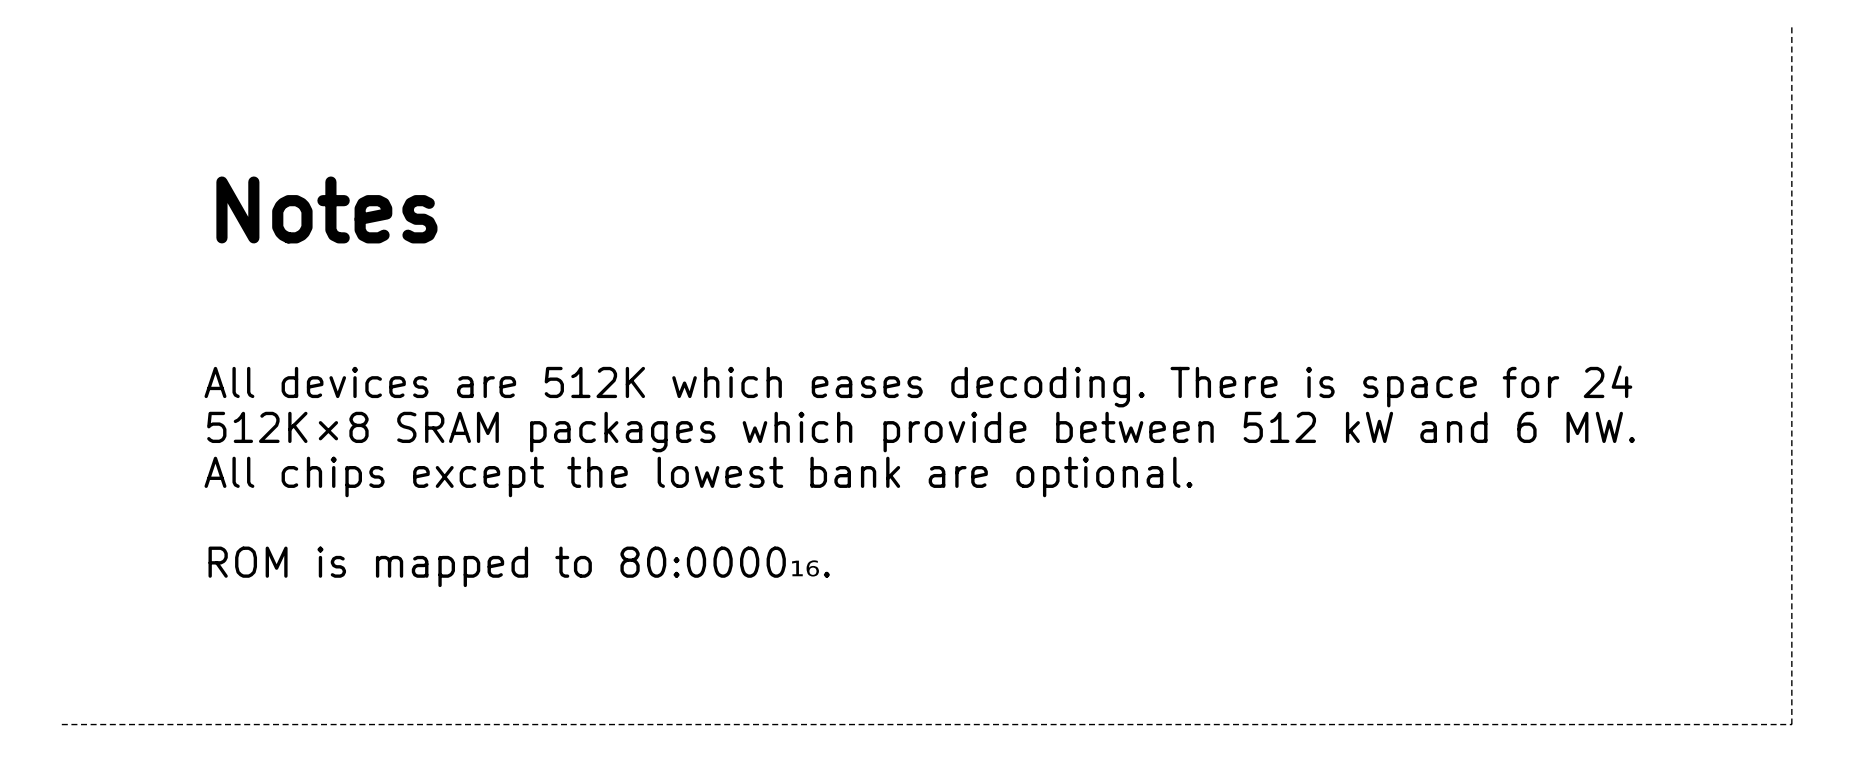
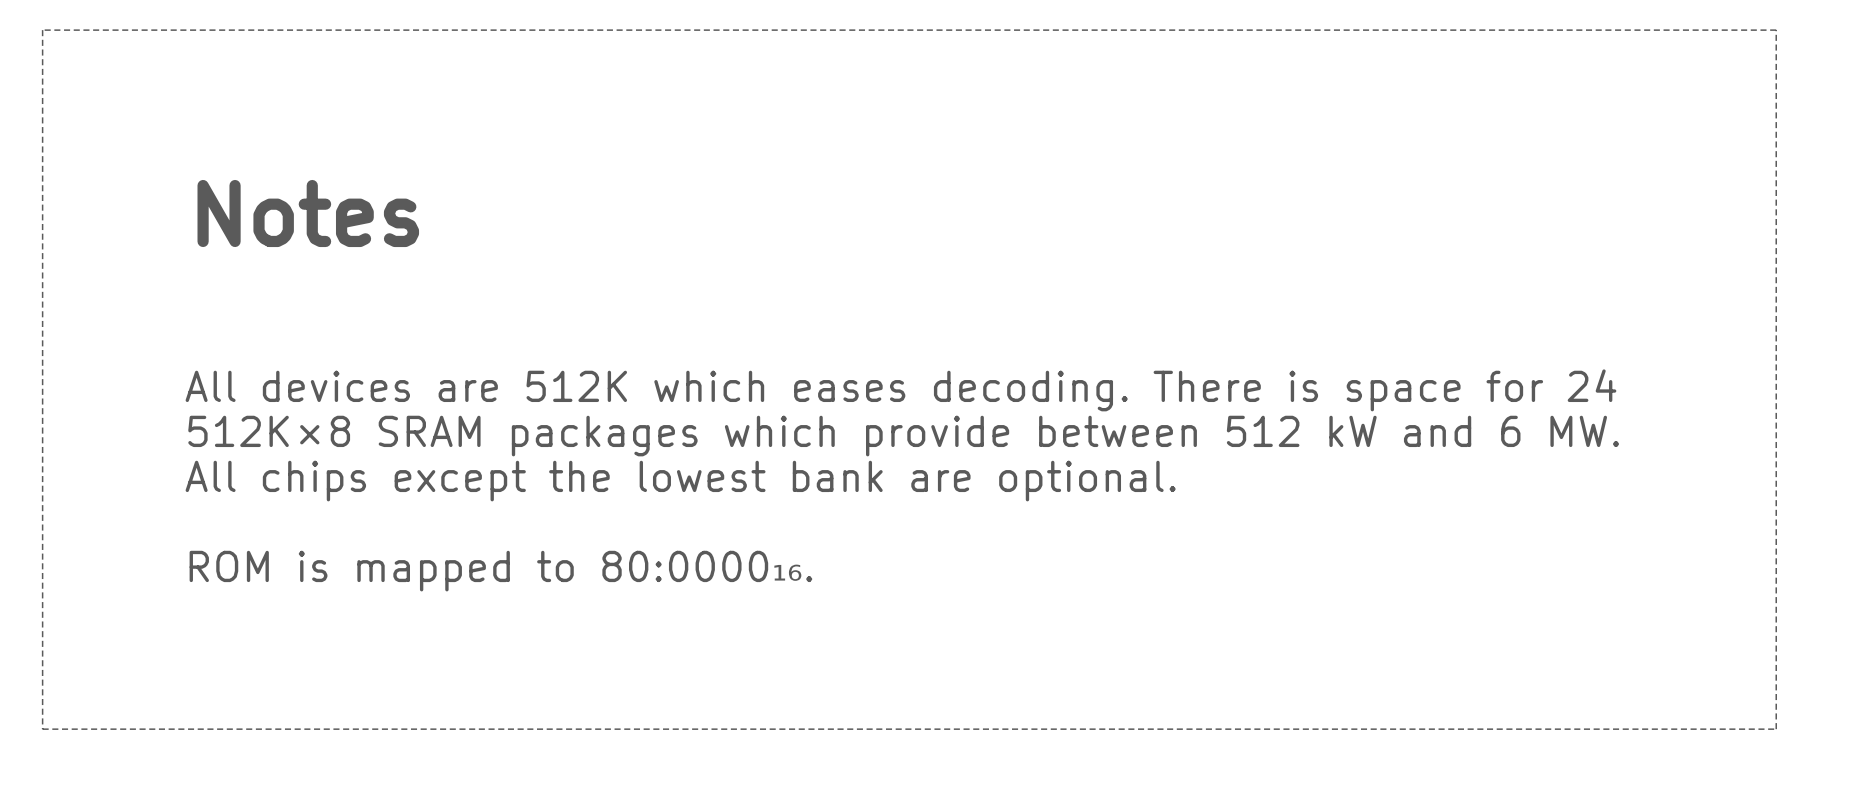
line: none -> (1776, 30) (42, 30) (42, 729)

